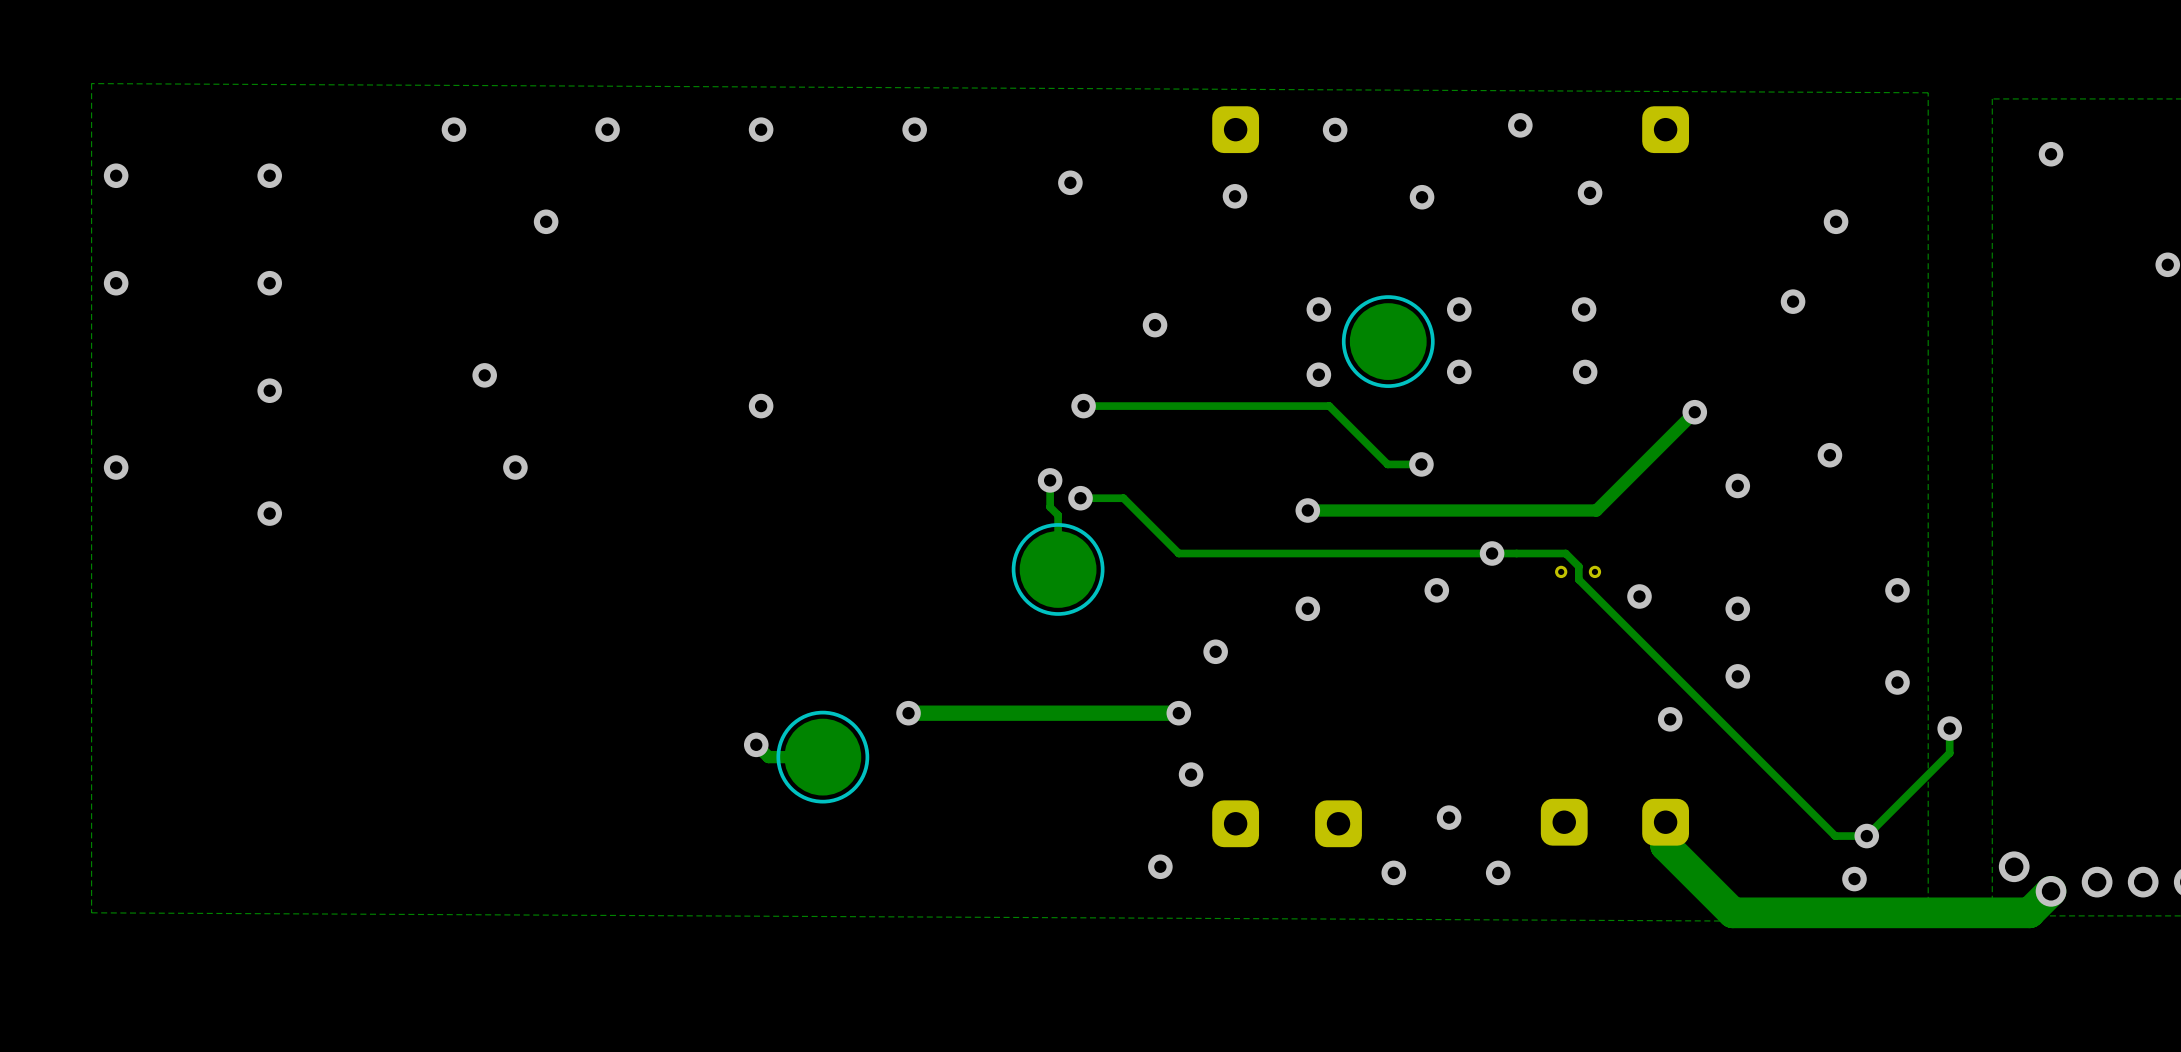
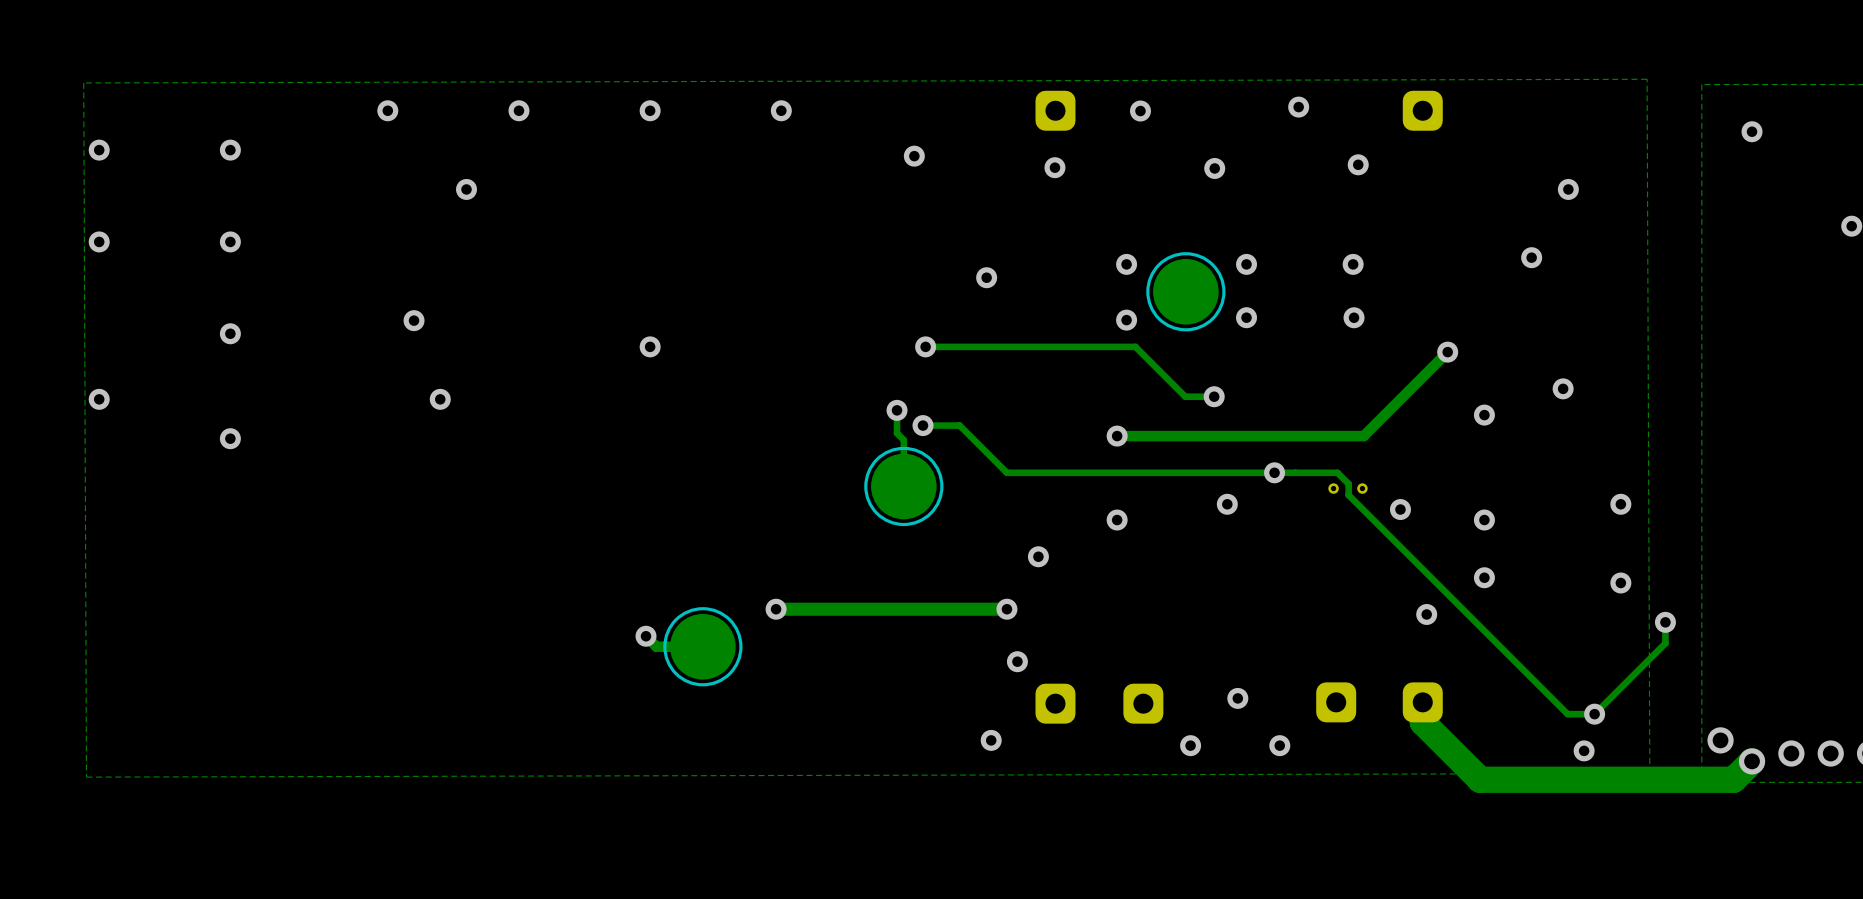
zone outline: (91, 83) (1928, 92) (1928, 922) (91, 912) (91, 83) -> (1647, 79) (1649, 773) (86, 777) (83, 82) (1647, 79)

